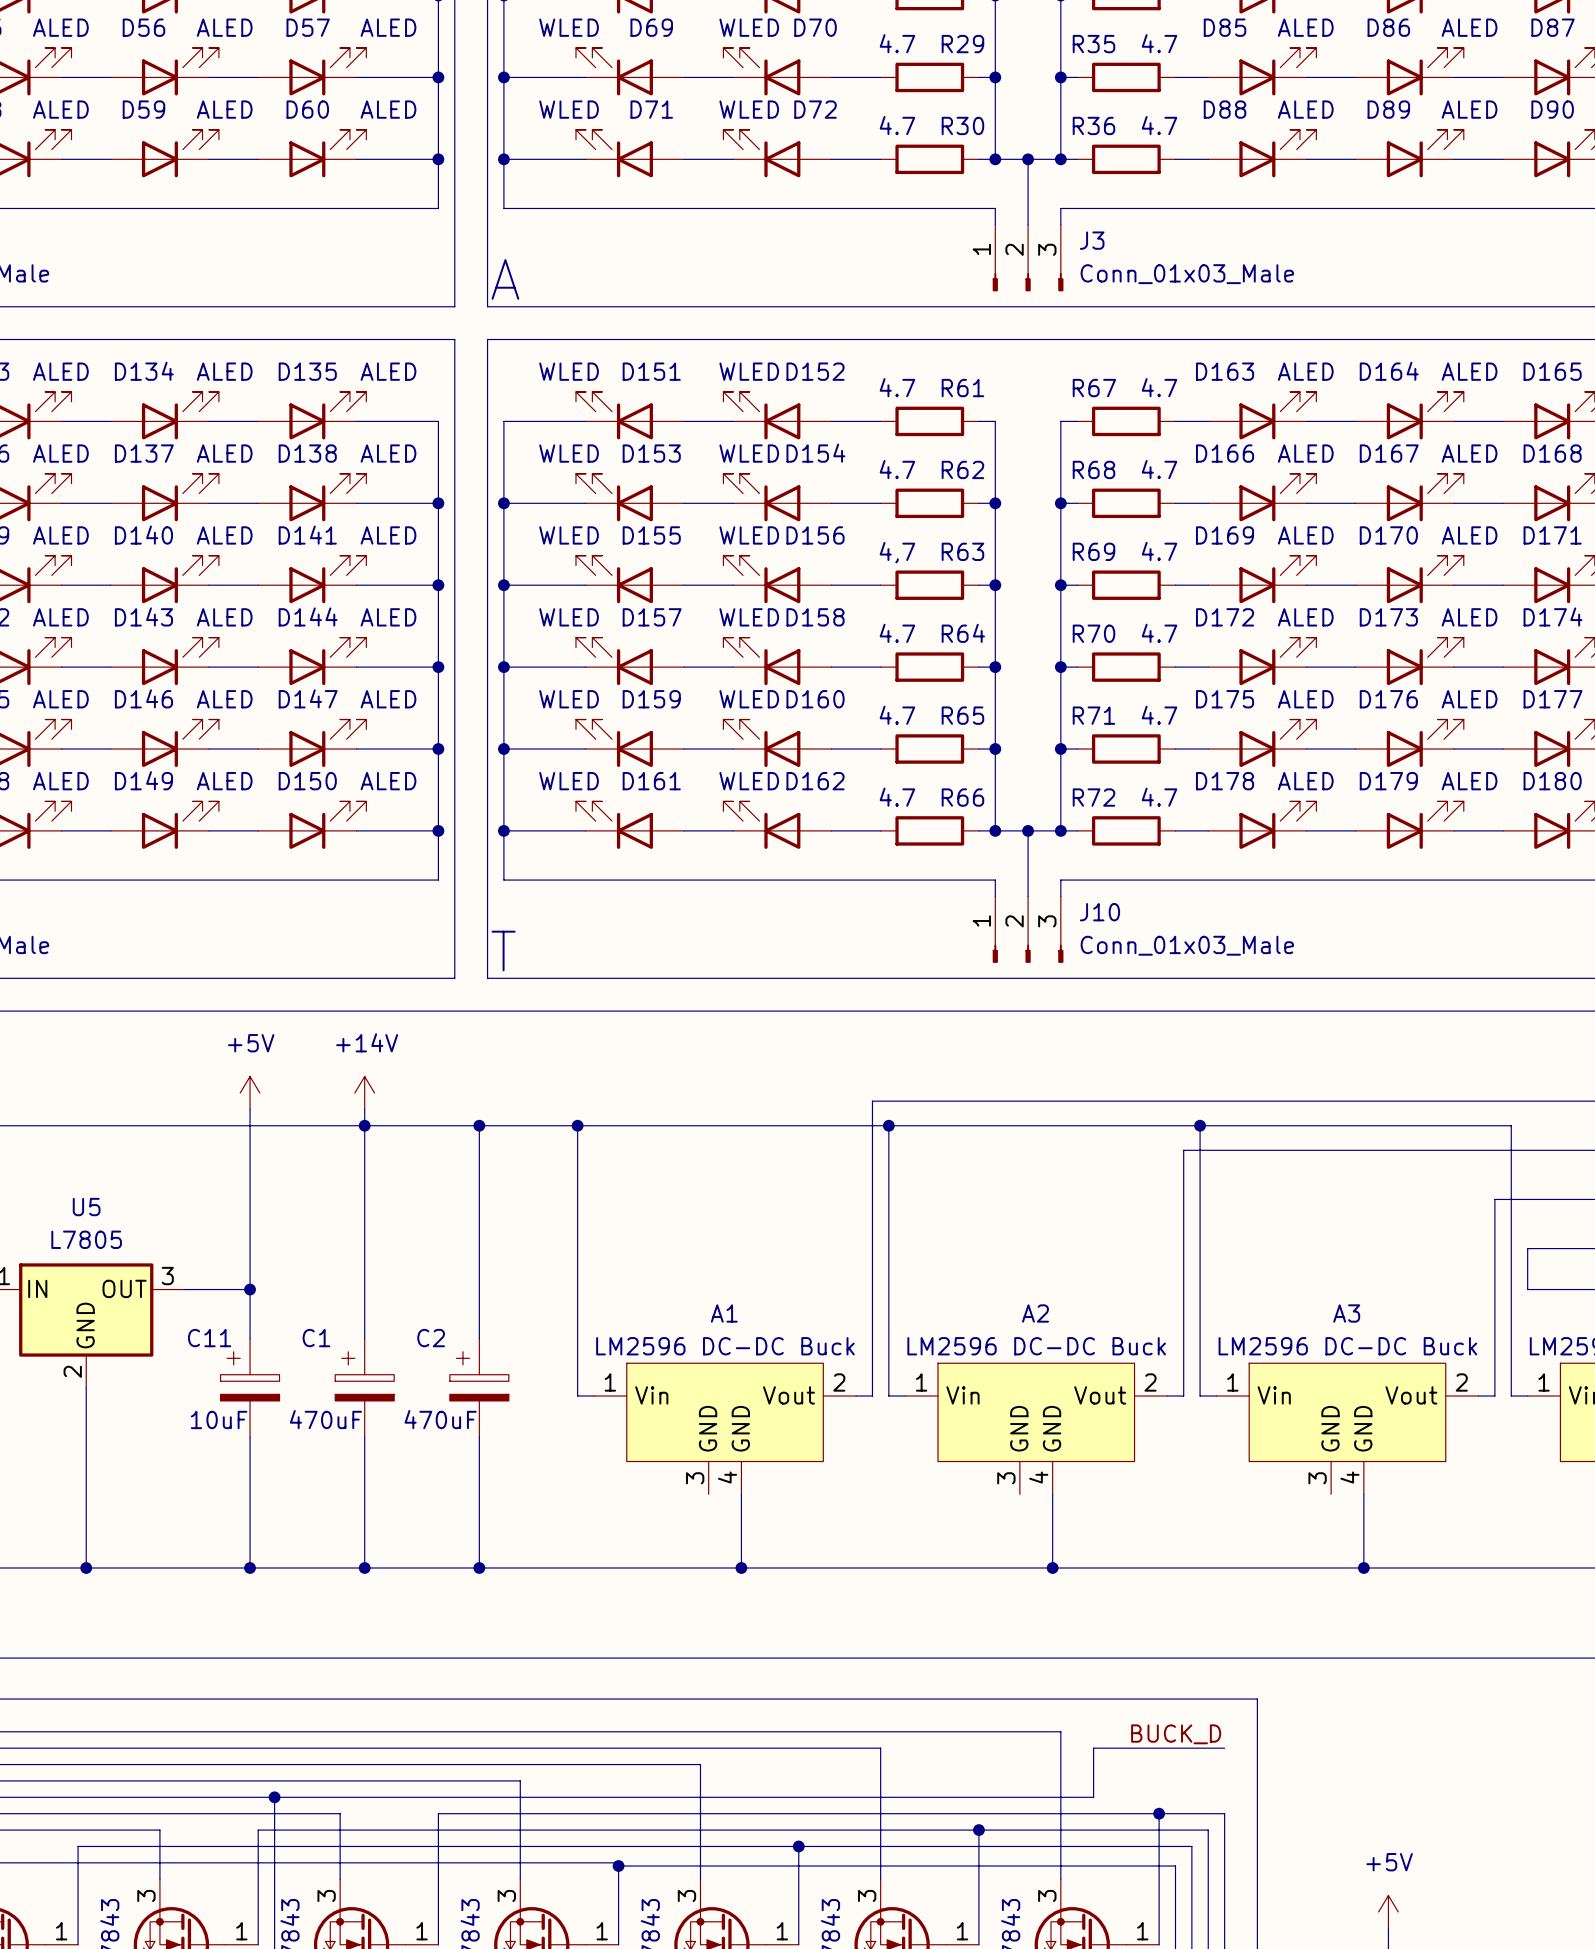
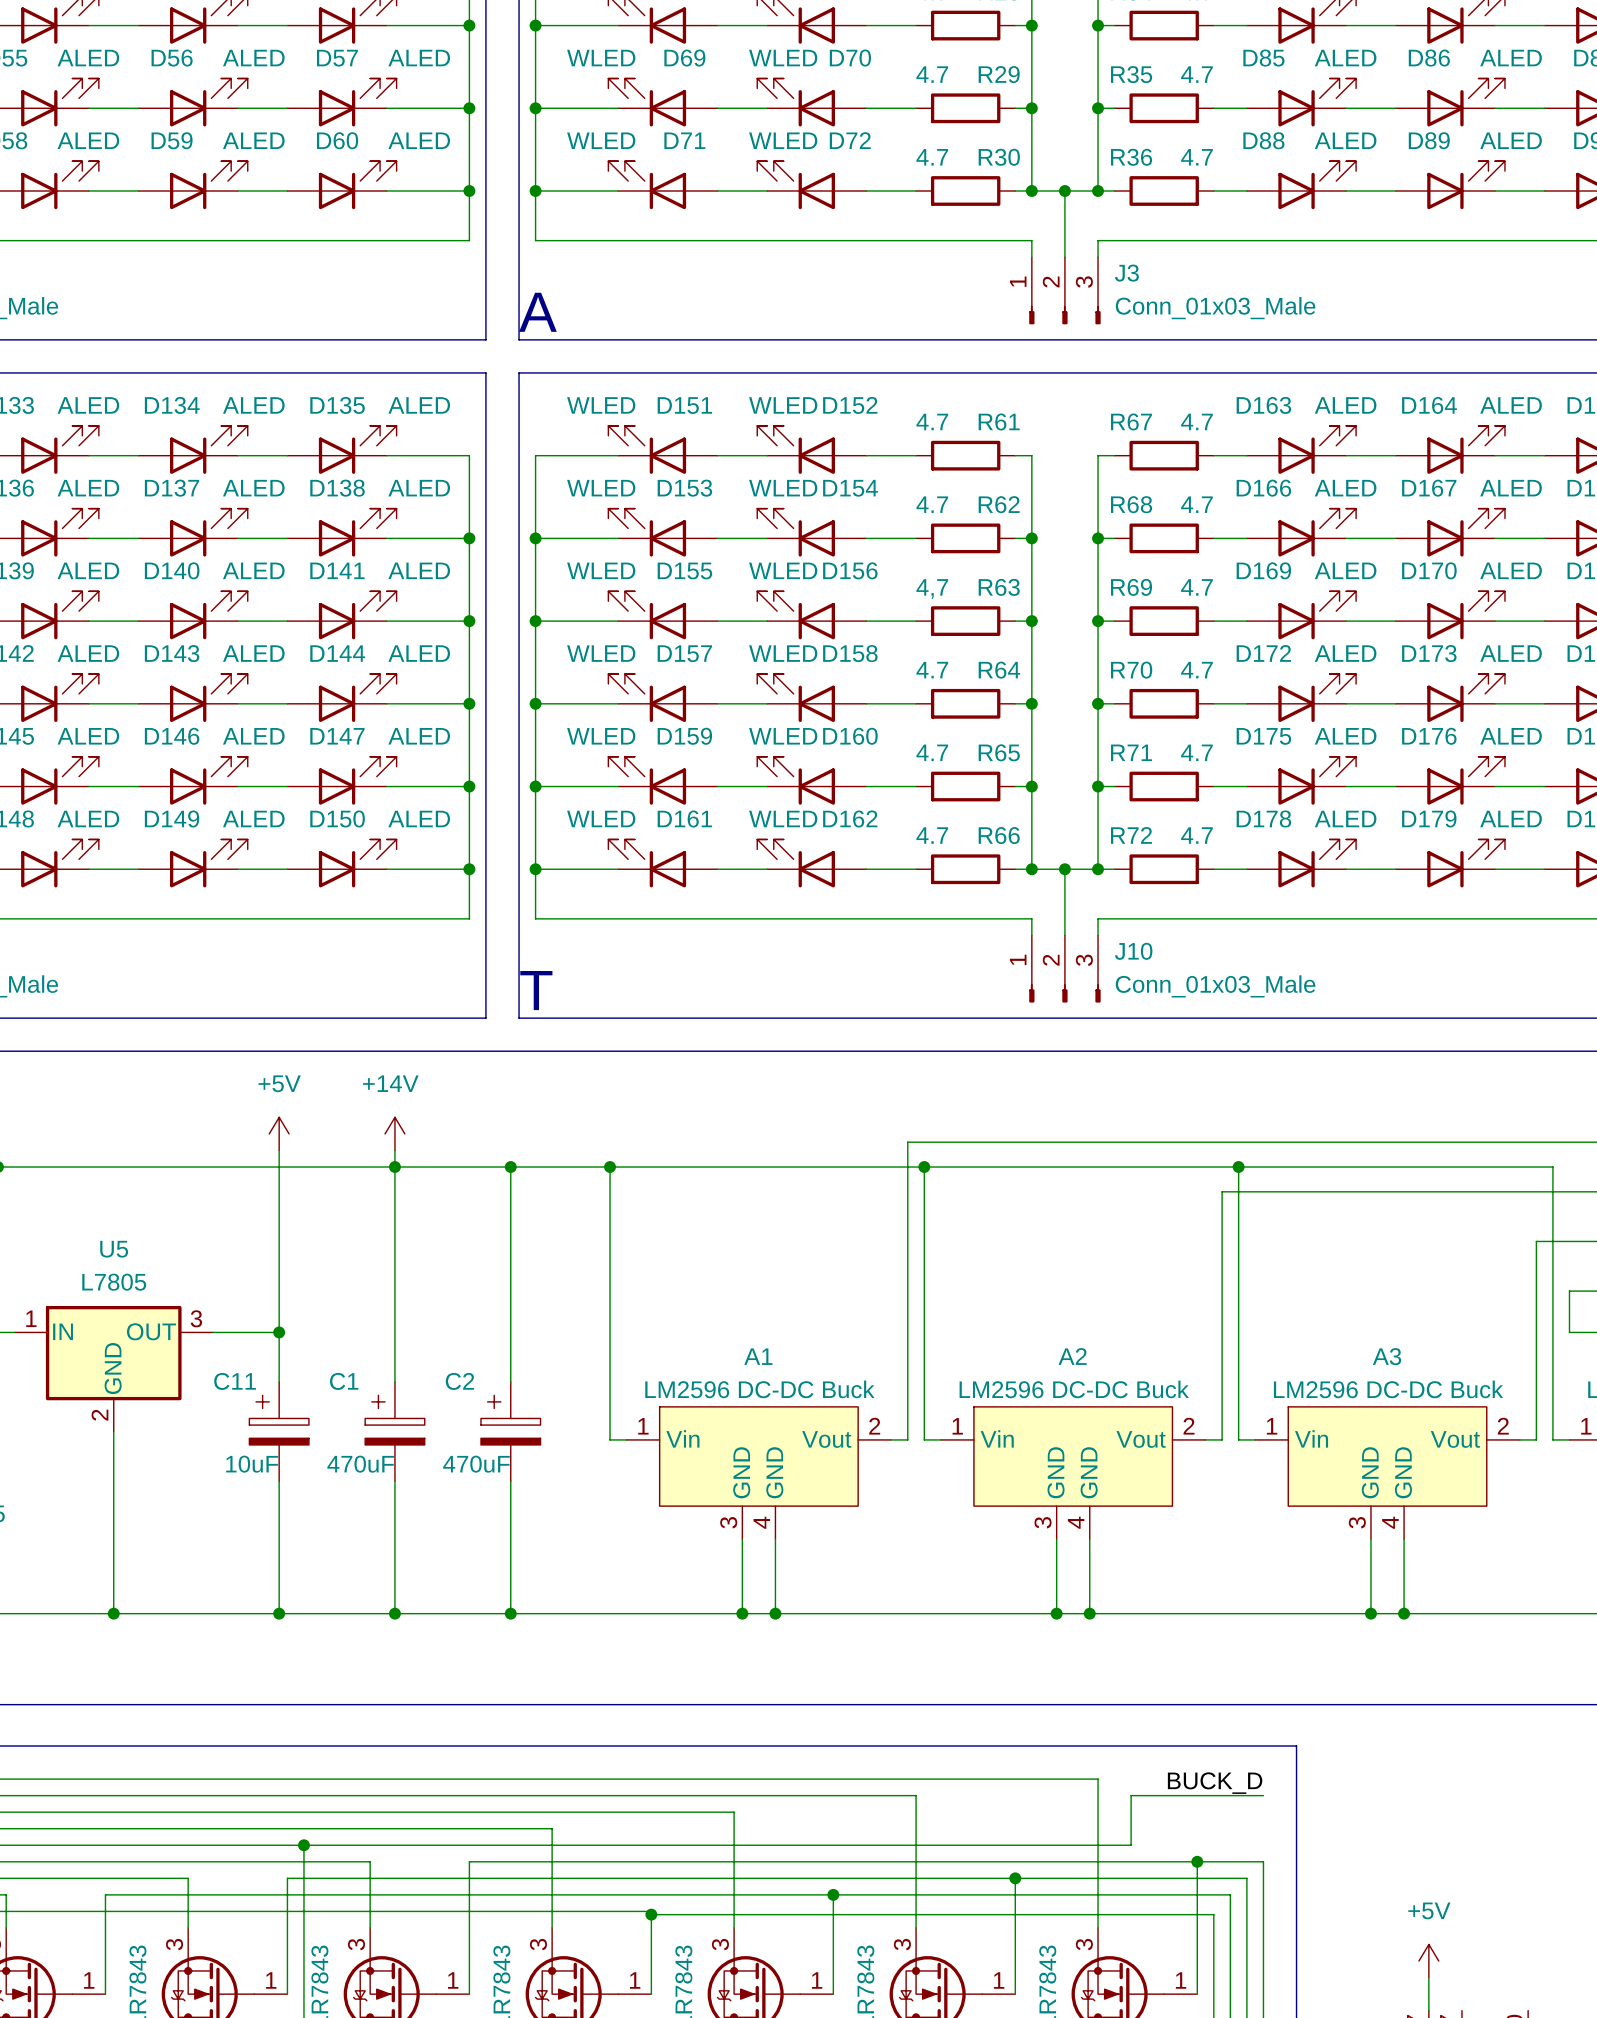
wire: none -> (742, 1539) (742, 1613)
wire: none -> (1056, 1539) (1056, 1613)
wire: none -> (1370, 1539) (1370, 1613)
junction: none -> (742, 1613)
junction: none -> (1056, 1613)
junction: none -> (1370, 1613)

